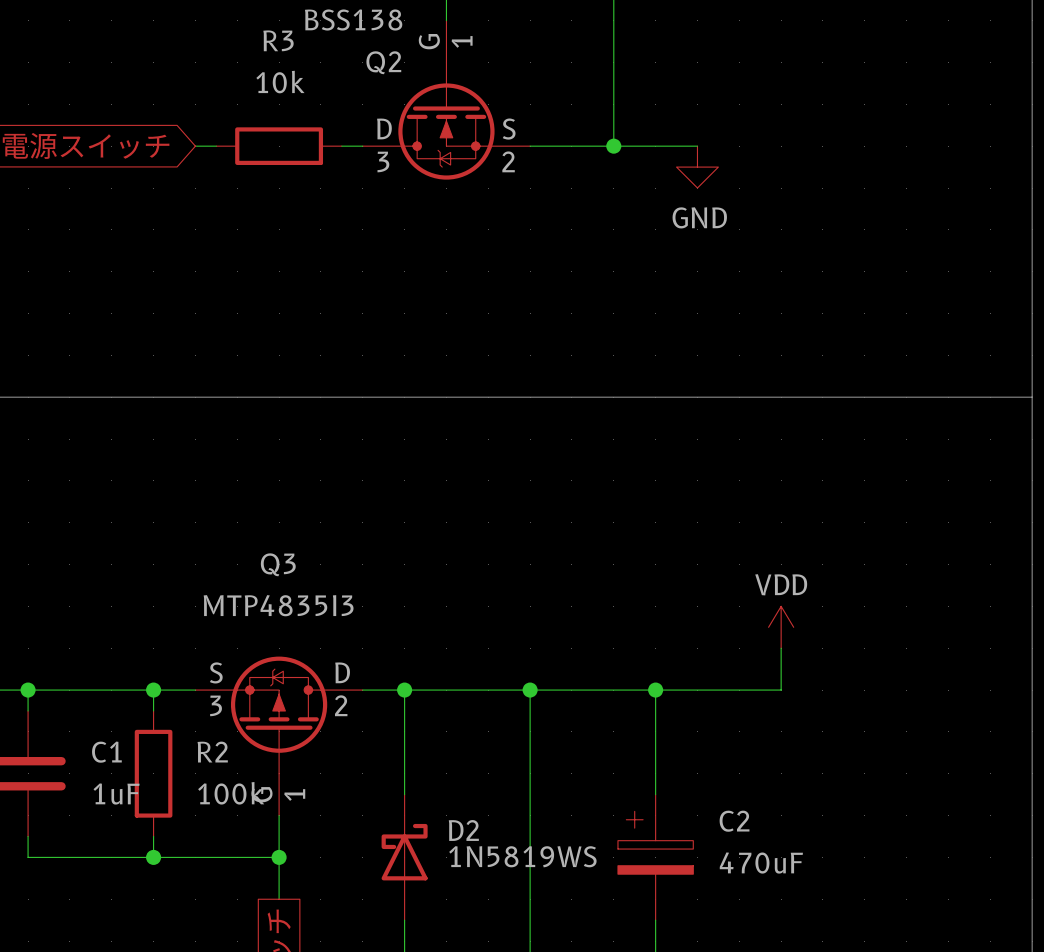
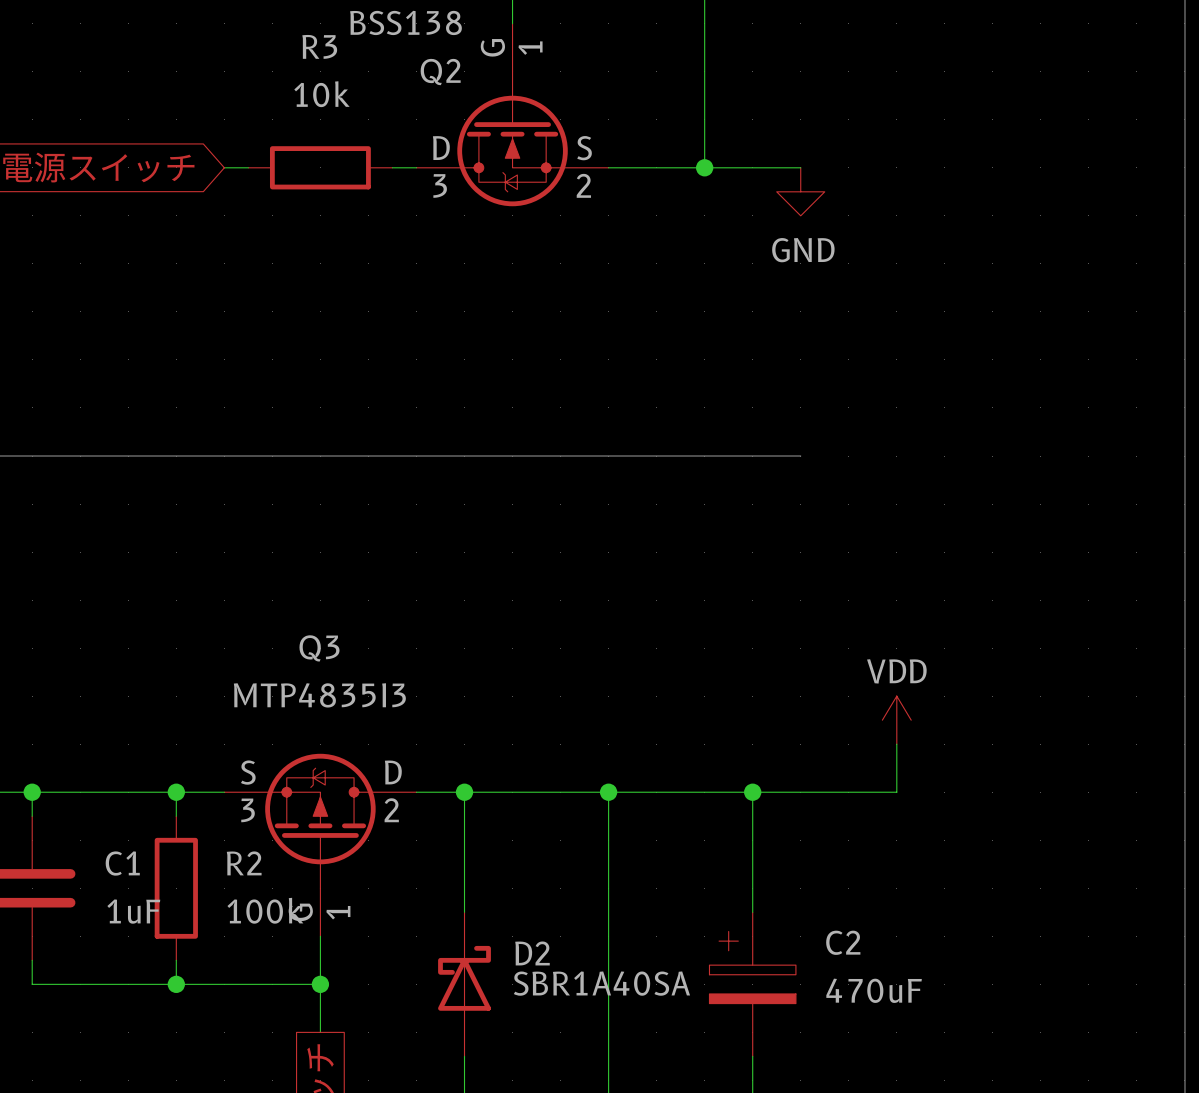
line: (697, 397) (1032, 397) -> none
D2 value: 1N5819WS (522, 856) -> SBR1A40SA (601, 983)

